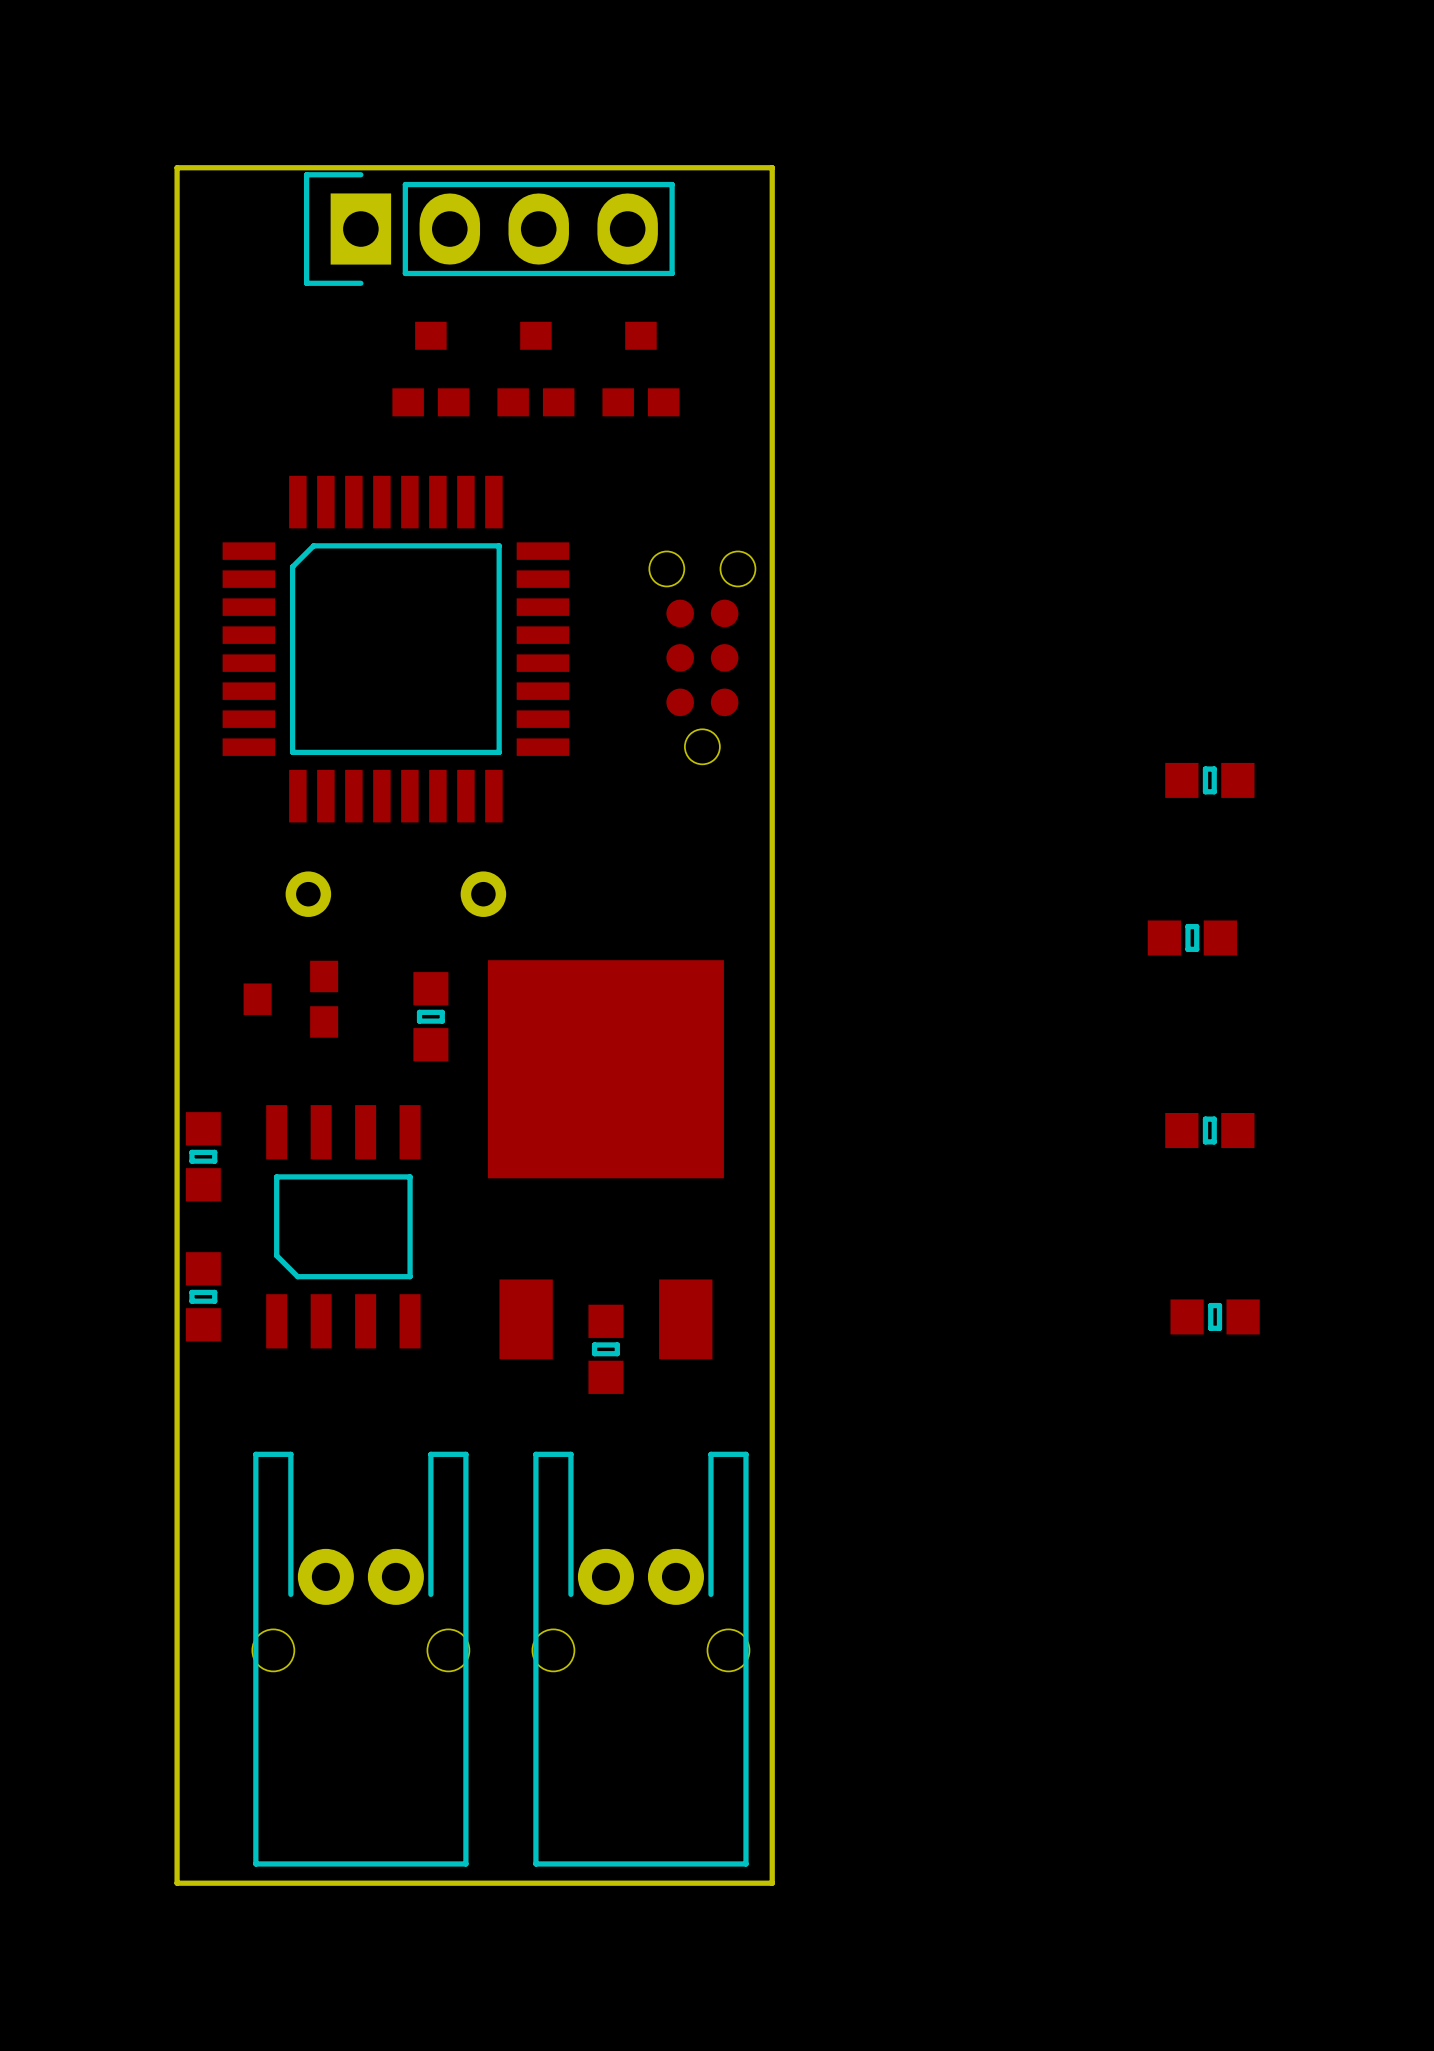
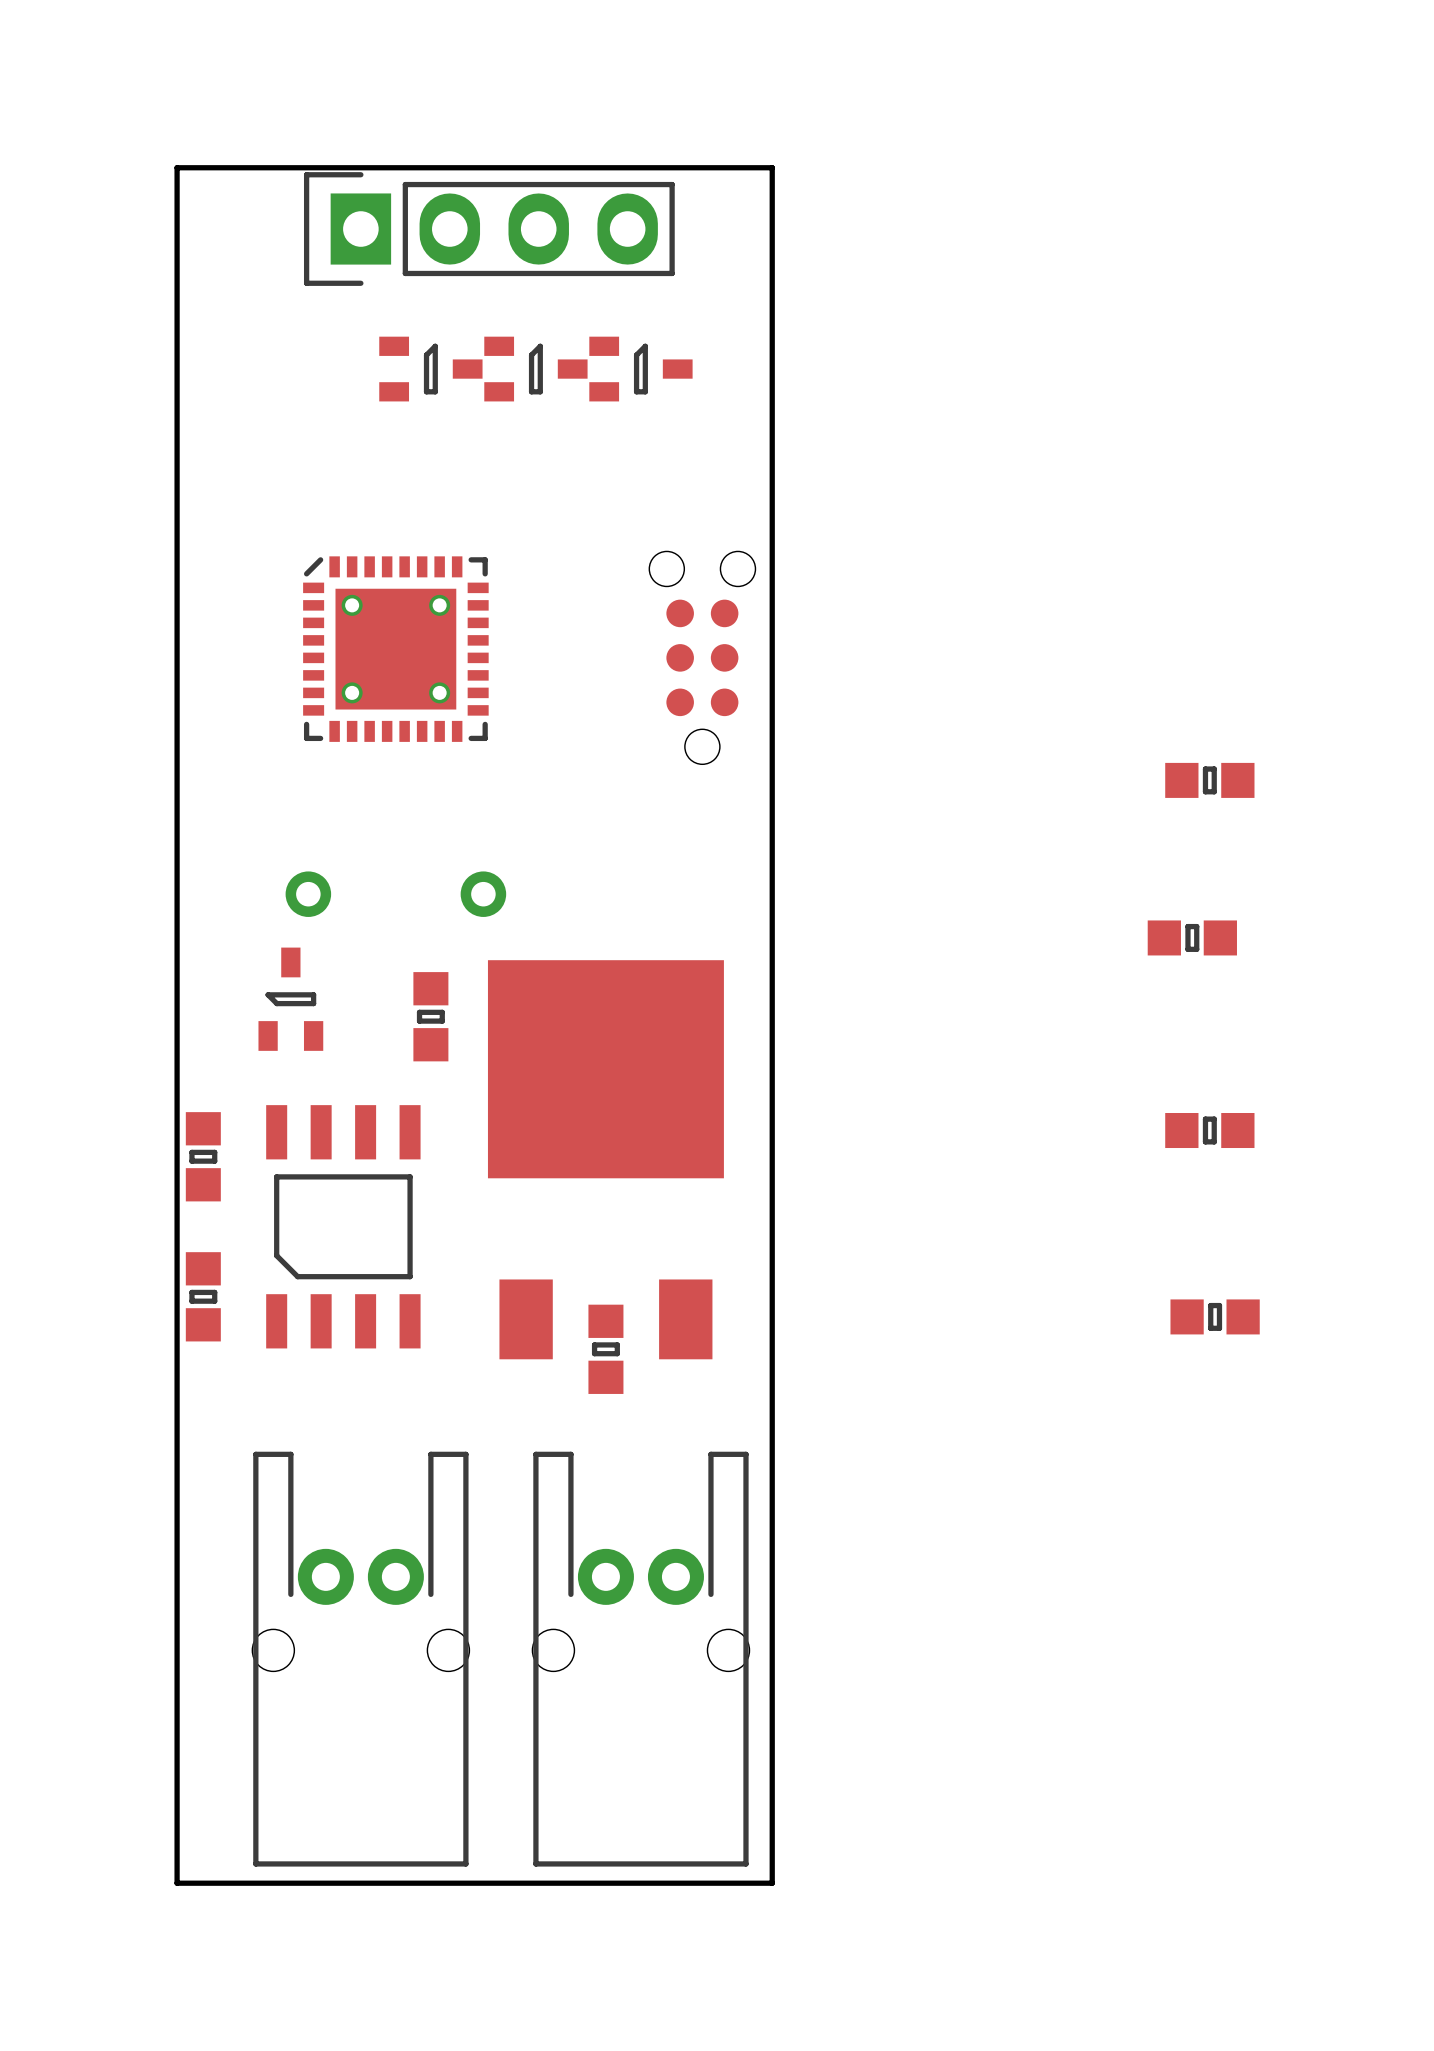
part footprint: [392, 321, 470, 417] -> [379, 336, 483, 402]
part footprint: [497, 321, 575, 417] -> [484, 336, 588, 402]
part footprint: [602, 321, 680, 417] -> [589, 336, 693, 402]
part footprint: [222, 475, 570, 823] -> [303, 556, 489, 742]
part footprint: [243, 960, 339, 1038] -> [258, 947, 324, 1051]

